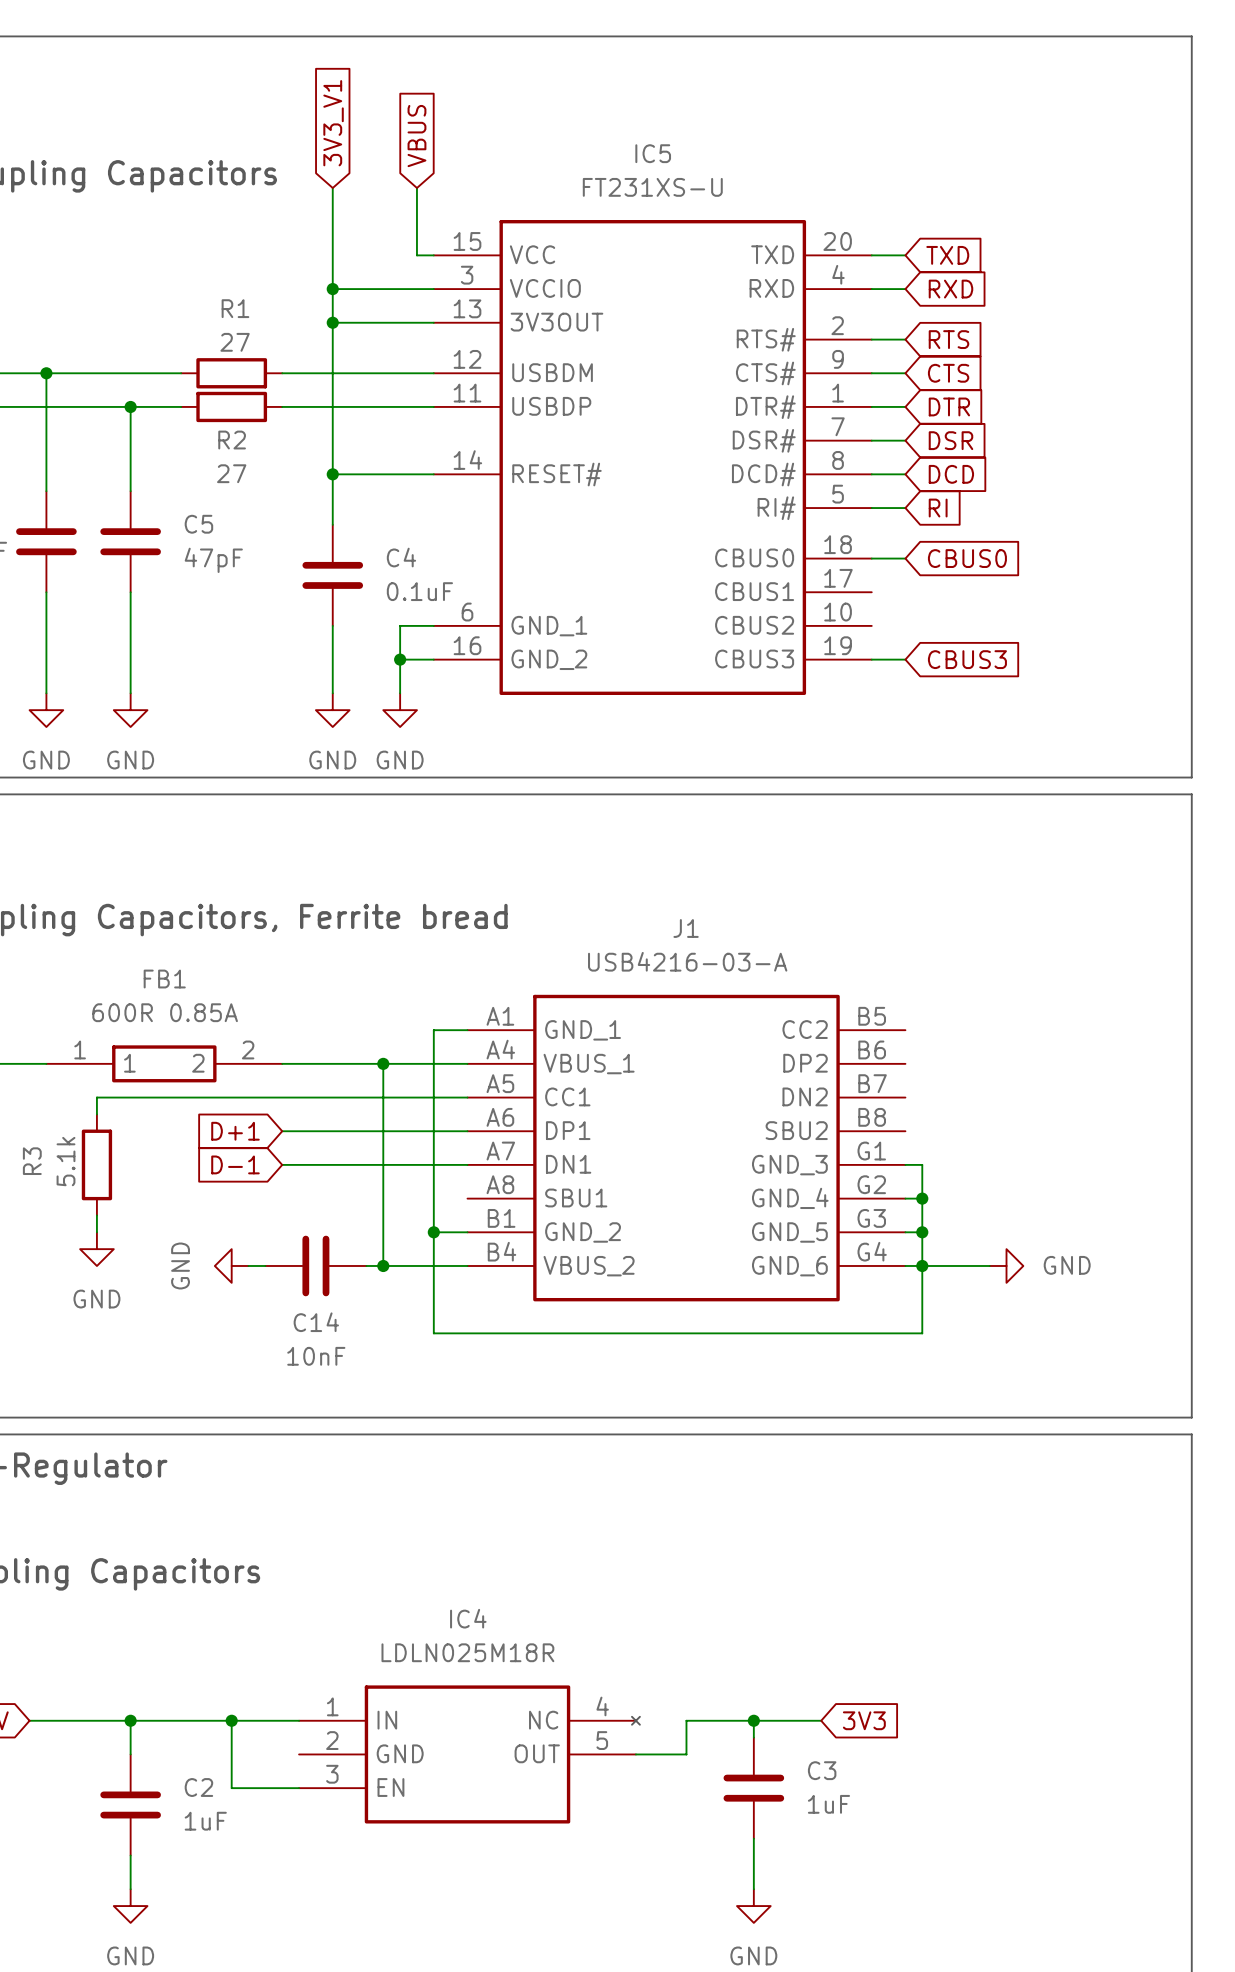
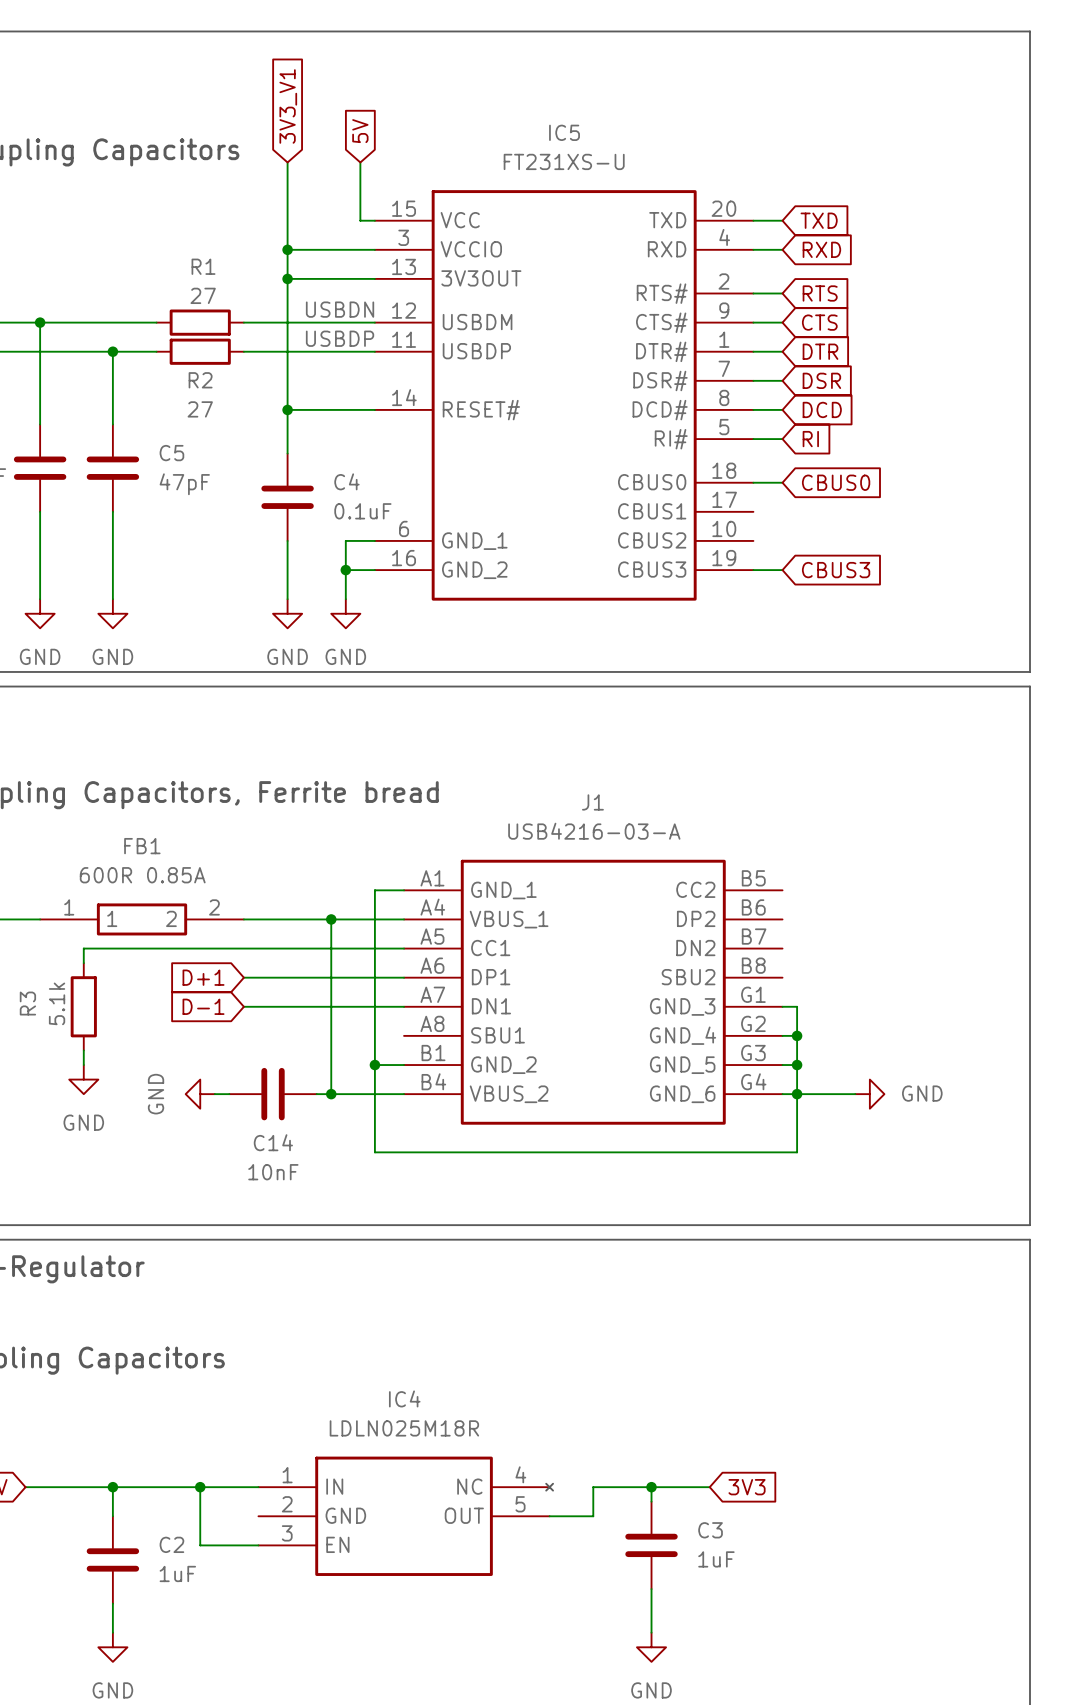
global label: VBUS (416, 136) -> 5V (360, 131)
label: none -> USBDN (340, 309)
label: none -> USBDP (340, 338)

